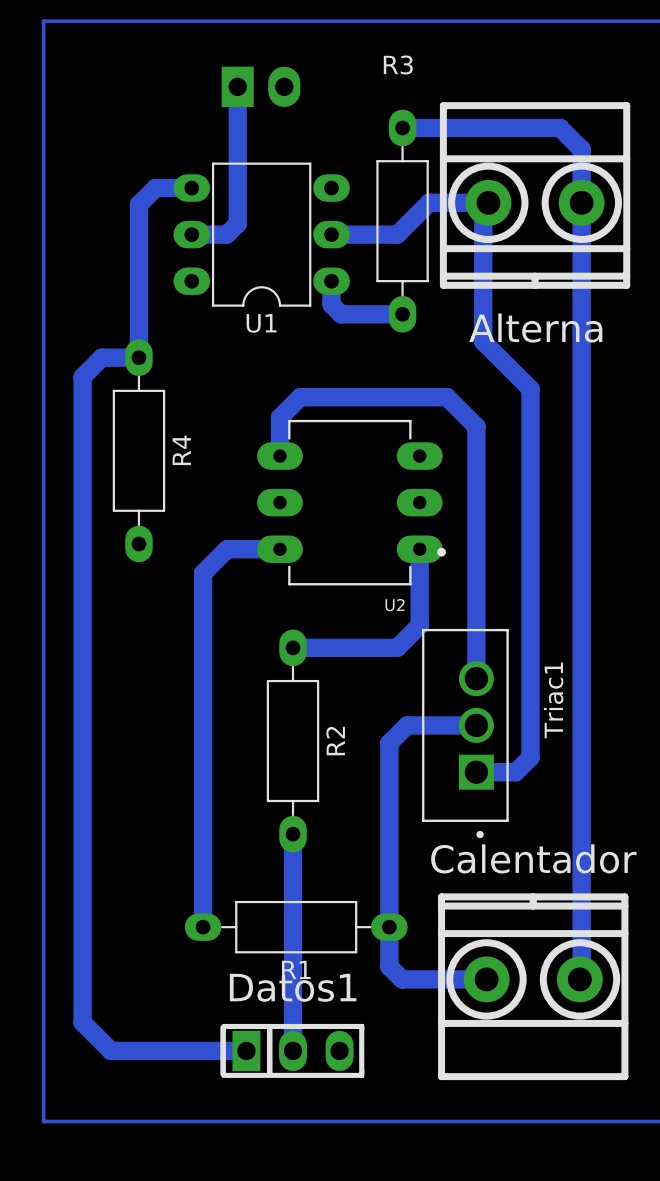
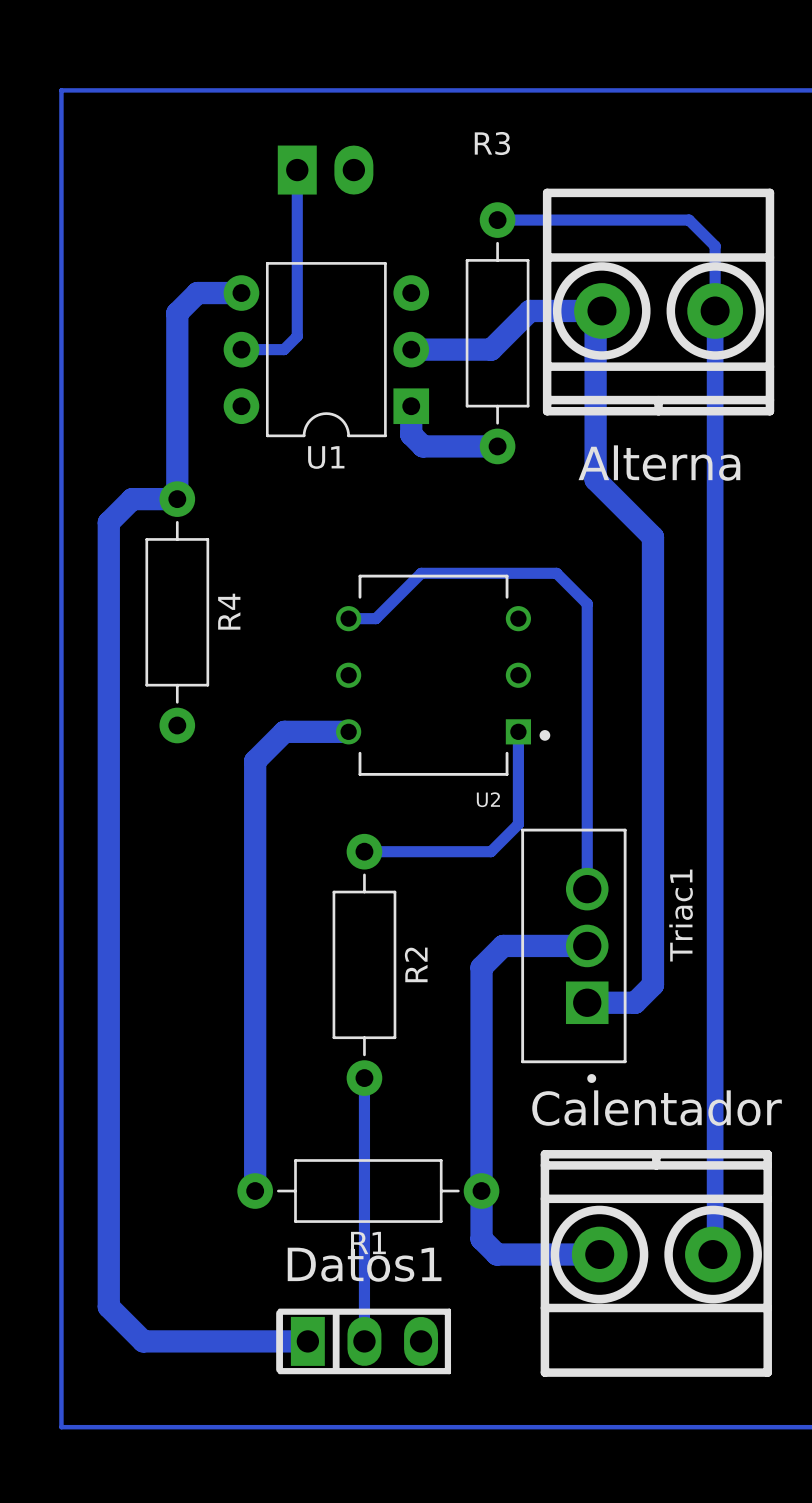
bottom track width: thick (237, 86) (237, 223) (226, 234) (191, 234) -> thin (297, 170) (297, 336) (284, 349) (241, 349)
R3 footprint: [376, 109, 429, 333] -> [465, 202, 530, 465]
bottom track width: thick (402, 127) (560, 127) (581, 149) (581, 977) (579, 979) -> thin (497, 220) (689, 220) (715, 246) (715, 1252) (712, 1254)
U1 footprint: [173, 162, 350, 307] -> [223, 262, 430, 438]
R4 footprint: [112, 339, 166, 563] -> [145, 481, 210, 744]
U2 footprint: [257, 419, 446, 586] -> [336, 574, 551, 776]
bottom track: (476, 443) (476, 426) (447, 397) (300, 397) (279, 417) (279, 456) -> (587, 603) (556, 573) (421, 573) (375, 618) (348, 618)
bottom track width: thick (476, 443) (476, 678) -> thin (587, 603) (587, 889)
bottom track width: thick (419, 549) (419, 625) (397, 647) (293, 647) -> thin (518, 731) (518, 824) (491, 851) (364, 851)
R2 footprint: [266, 629, 320, 853] -> [332, 833, 397, 1096]
bottom track width: thick (293, 834) (293, 1050) -> thin (364, 1078) (364, 1341)
R1 footprint: [184, 900, 408, 954] -> [237, 1159, 500, 1223]

